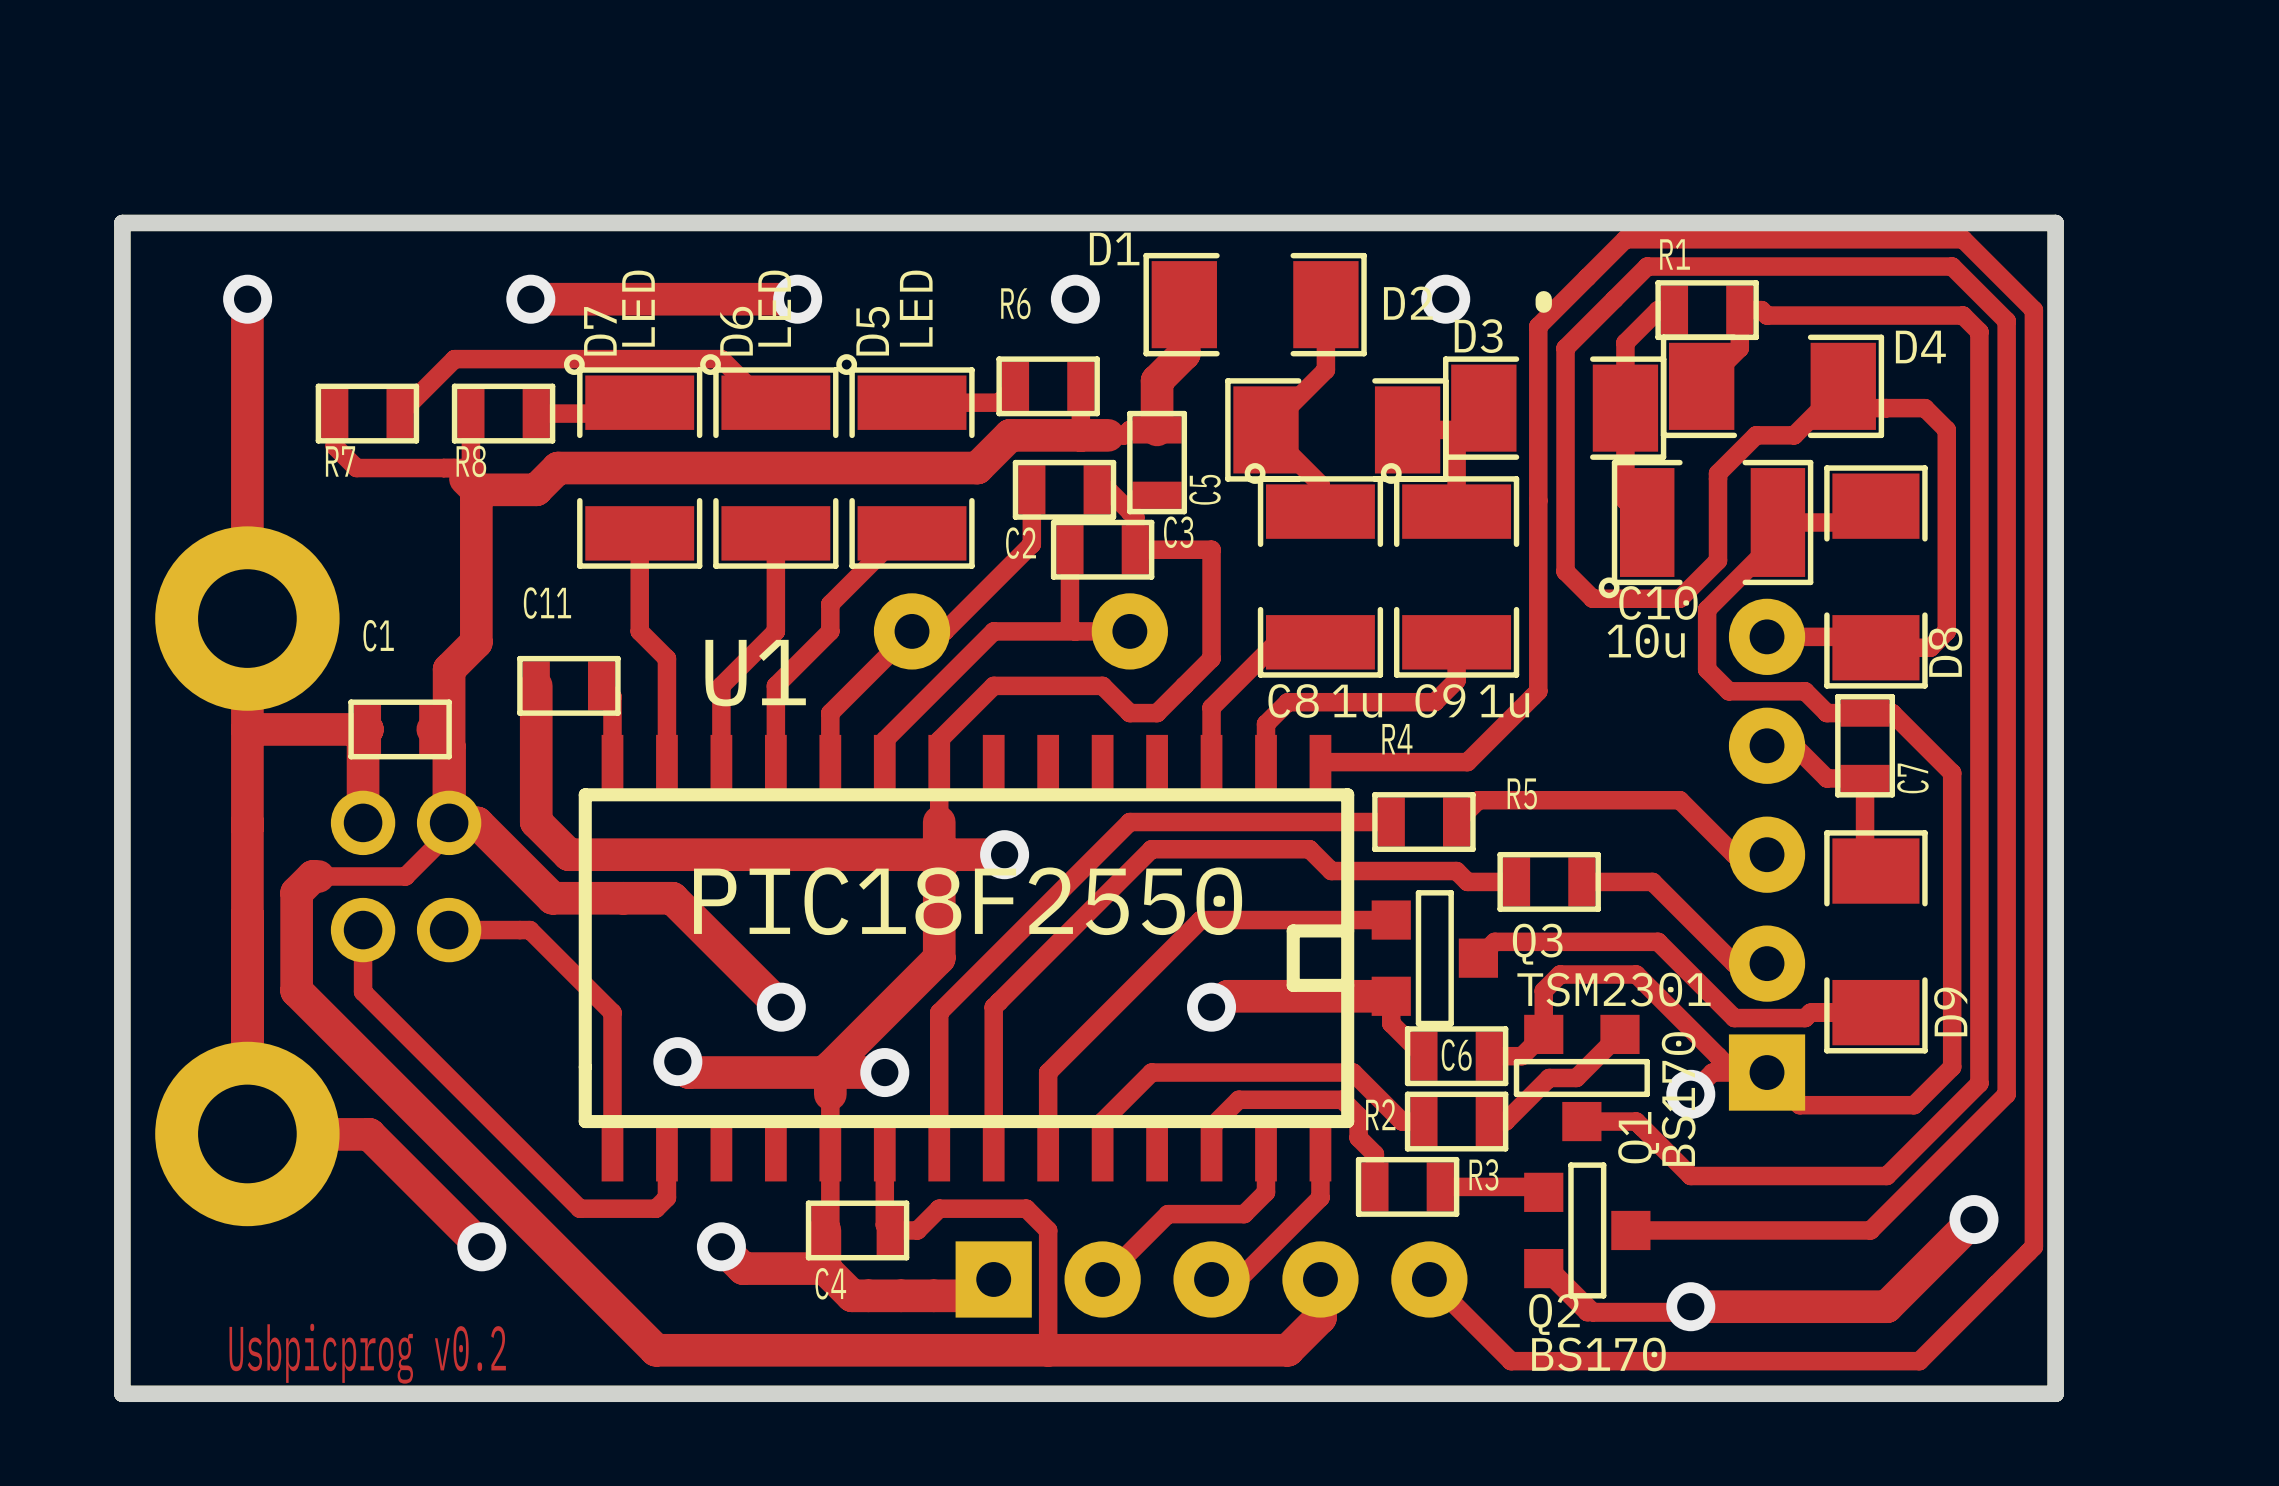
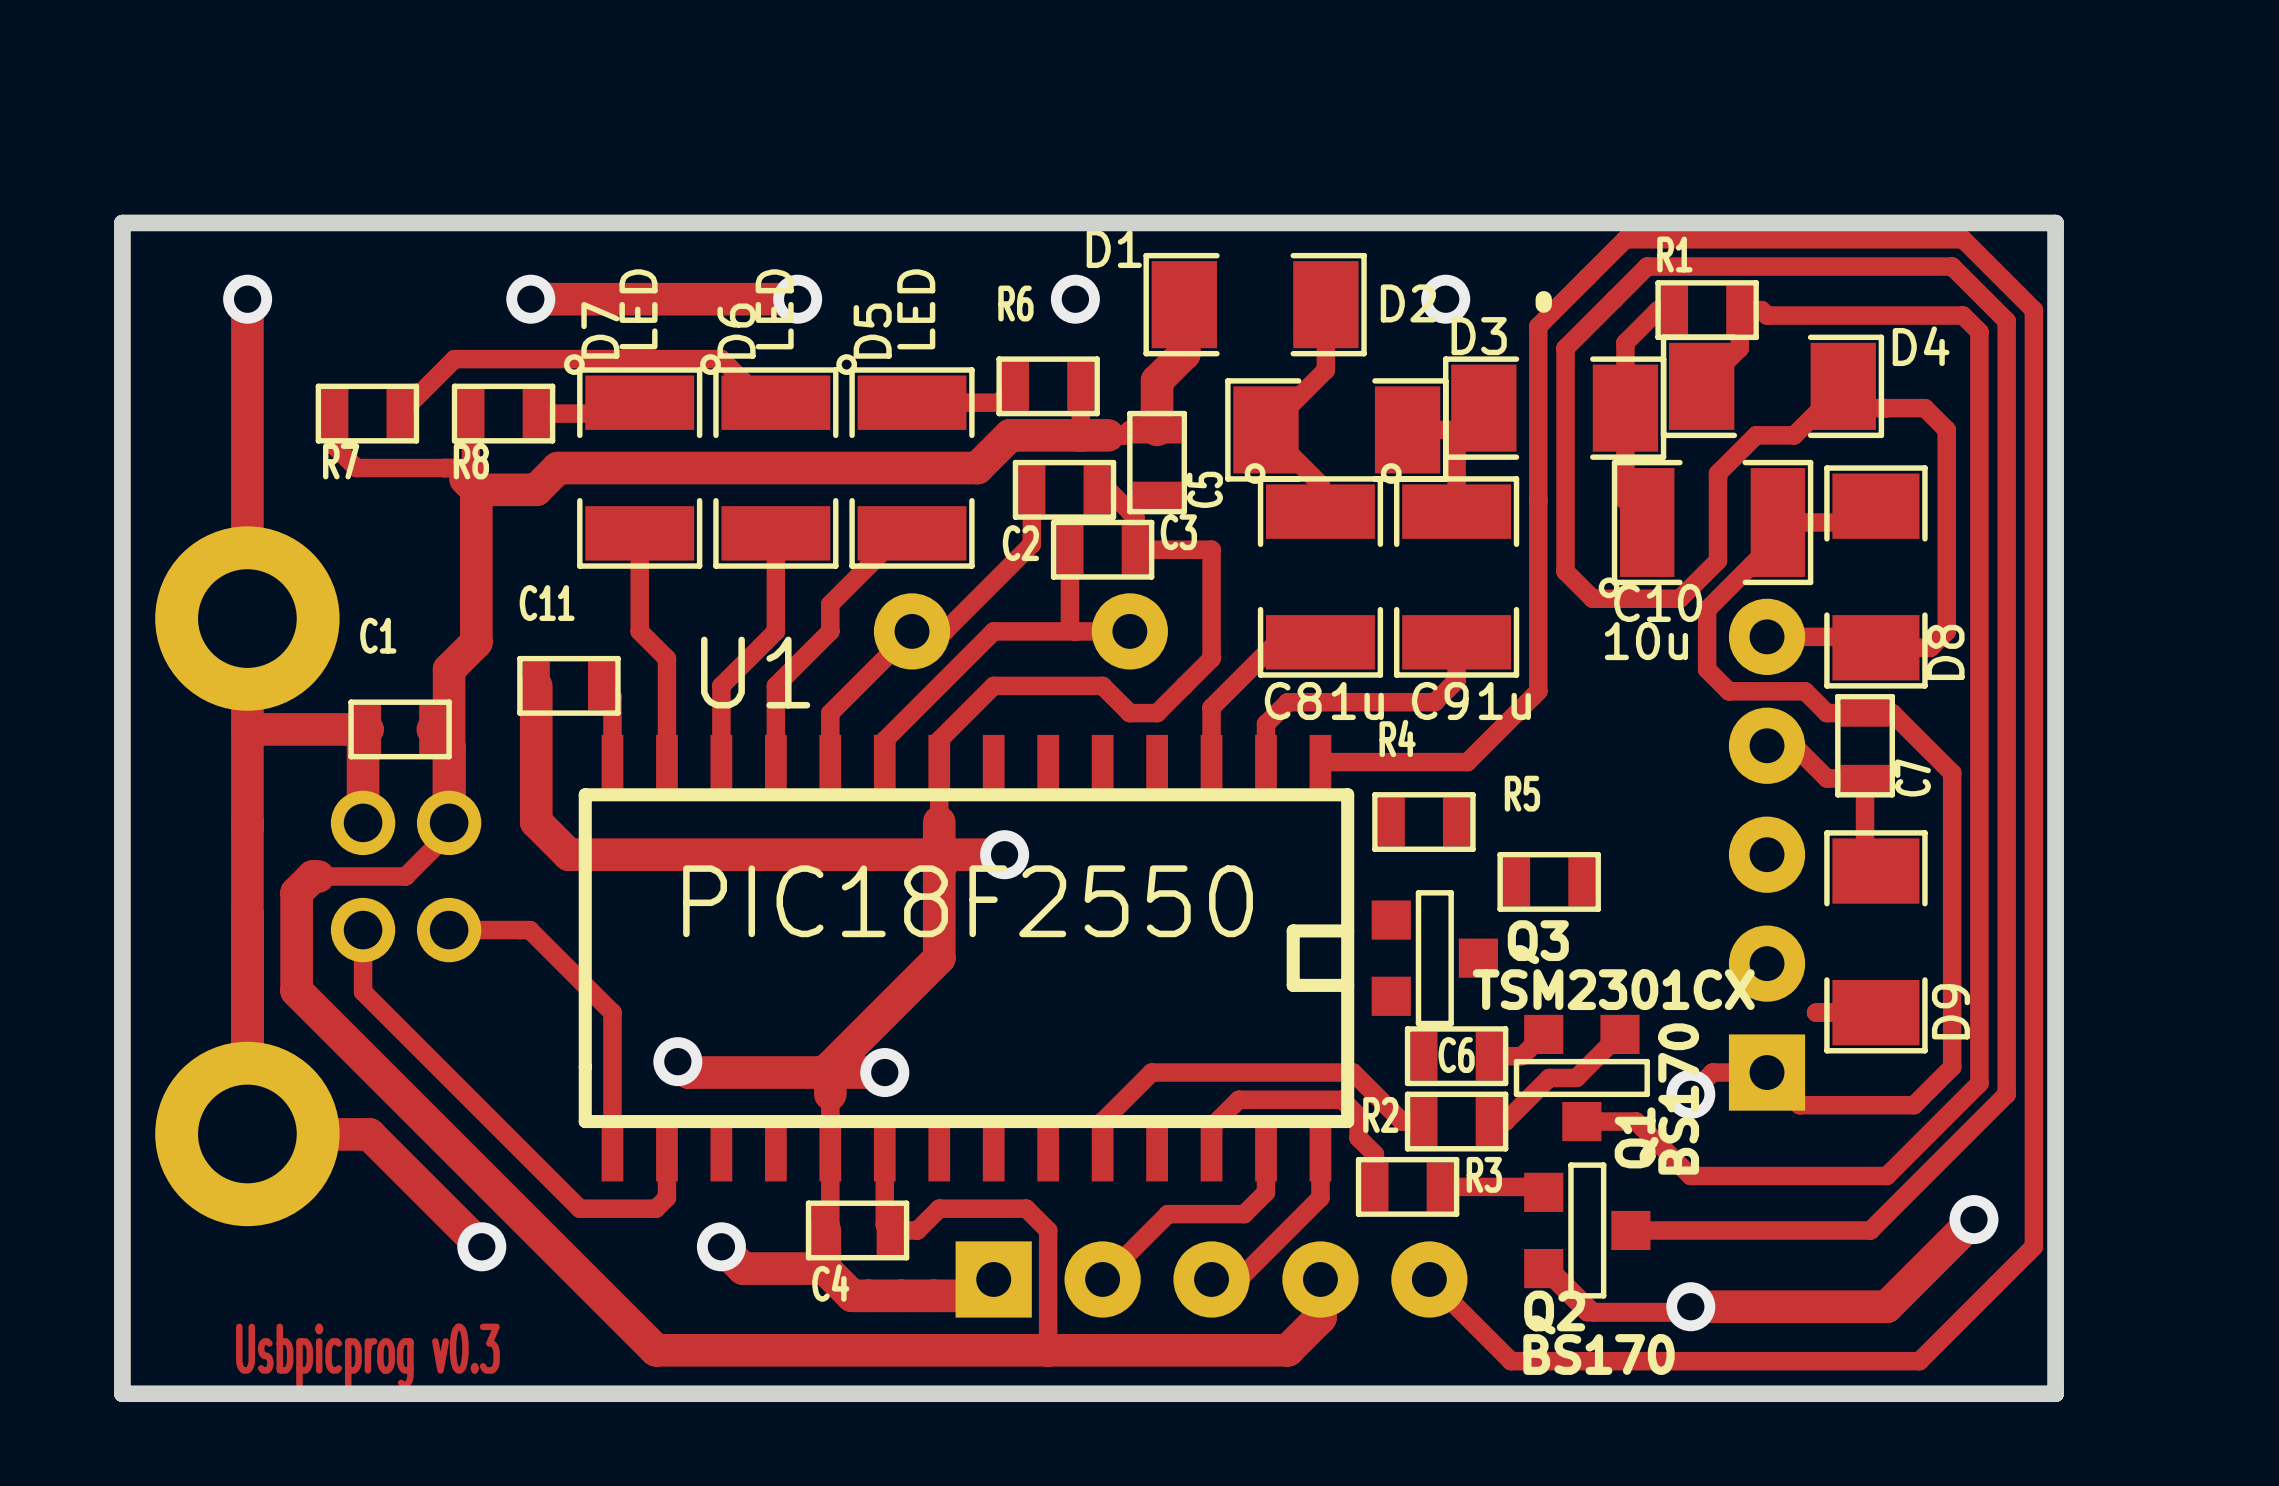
track: (449, 822) (477, 822) (552, 898) (672, 898) (781, 1007) -> none
track: (1391, 822) (1129, 822) (939, 1012) (939, 1154) -> none
track: (1456, 822) (1478, 800) (1679, 800) (1734, 854) (1767, 854) -> none
track: (1516, 881) (1467, 881) (1456, 871) (1331, 871) (1309, 849) (1151, 849) (993, 1007) (993, 1154) -> none
track: (1581, 881) (1652, 881) (1734, 963) (1767, 963) -> none
track: (1391, 920) (1200, 920) (1048, 1072) (1048, 1154) -> none
track: (1478, 958) (1494, 941) (1658, 941) (1734, 1018) (1805, 1018) (1810, 1012) (1816, 1012) -> none
Q3 value: TSM2301 (1614, 989) -> TSM2301CX (1613, 989)
via: (781, 1007) -> none
track: (1211, 1007) (1216, 1007) (1227, 996) (1391, 996) (1391, 1023) (1423, 1056) -> none
via: (1211, 1007) -> none
track: (1543, 1034) (1543, 990) (1560, 974) (1636, 974) (1734, 1072) -> none
text: Usbpicprog v0.2 (367, 1353) -> Usbpicprog v0.3 (367, 1355)

